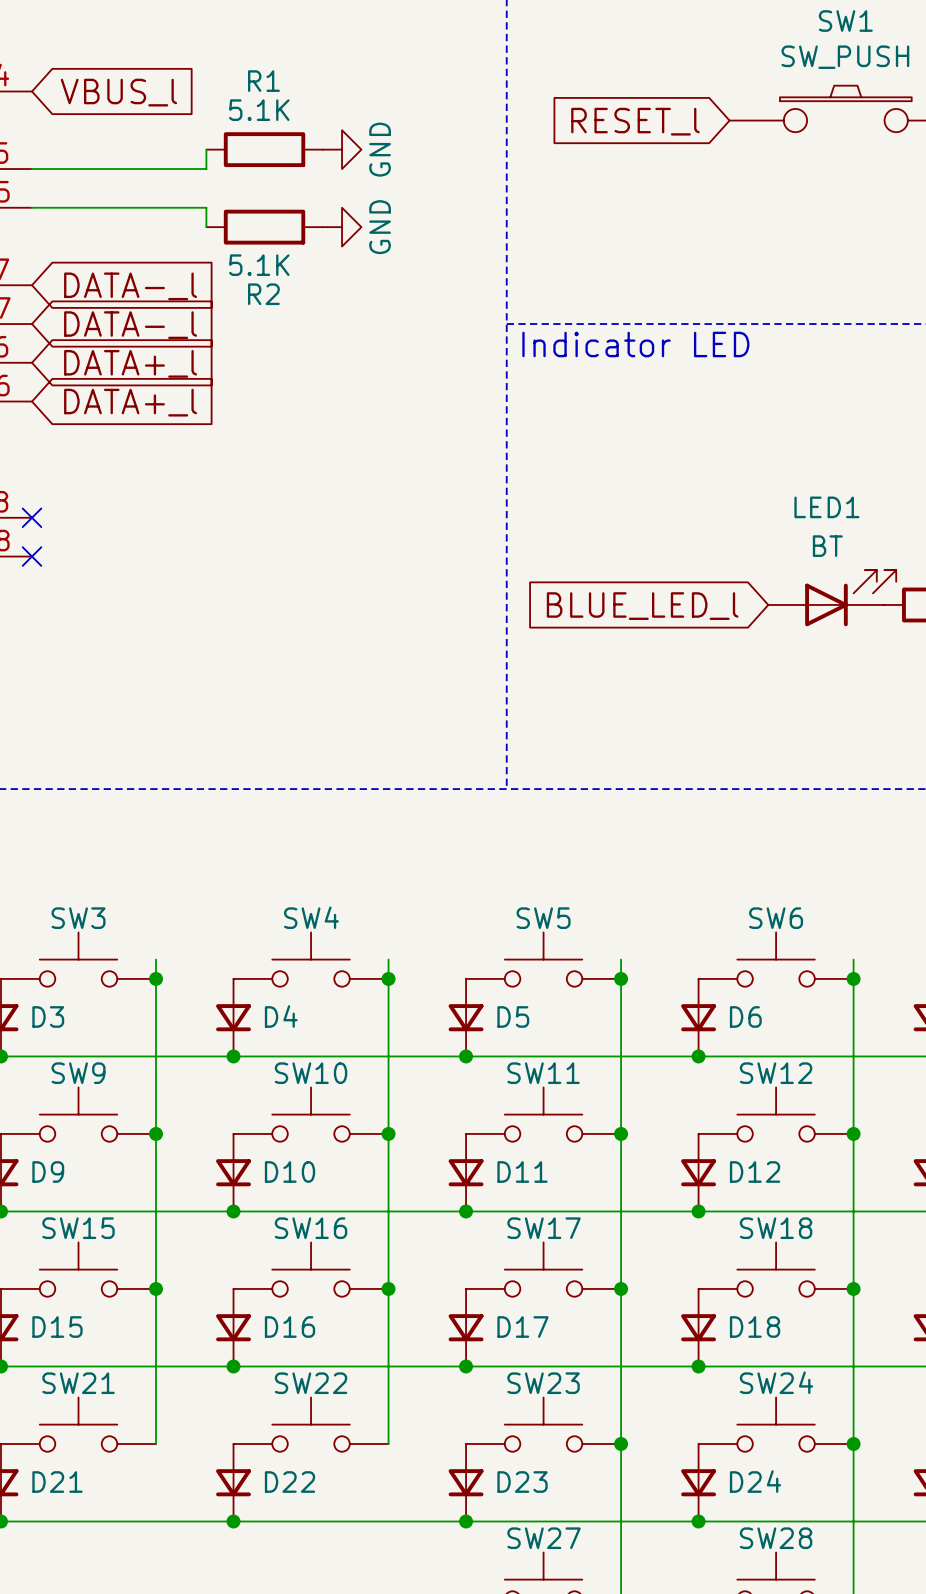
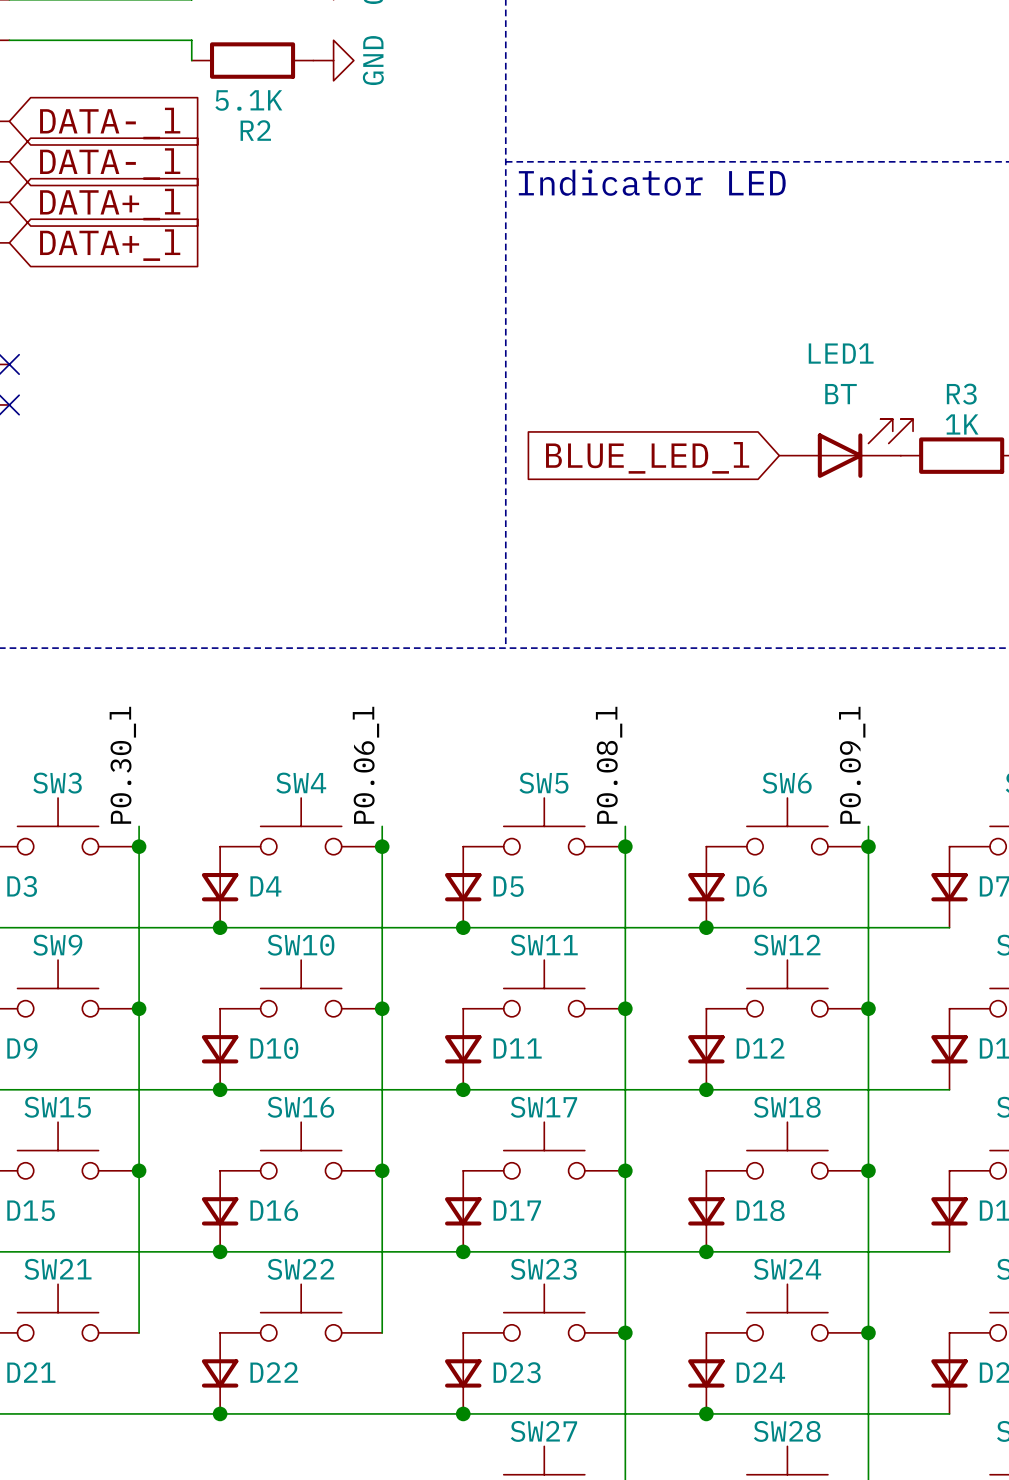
label: none -> P0.30_l (122, 765)
label: none -> P0.06_l (365, 765)
label: none -> P0.08_l (609, 765)
label: none -> P0.09_l (852, 765)

